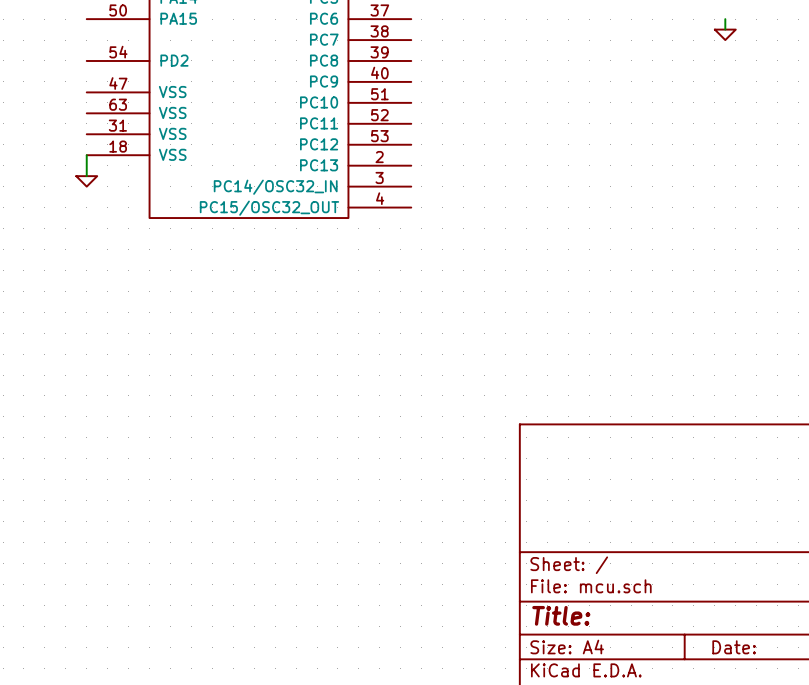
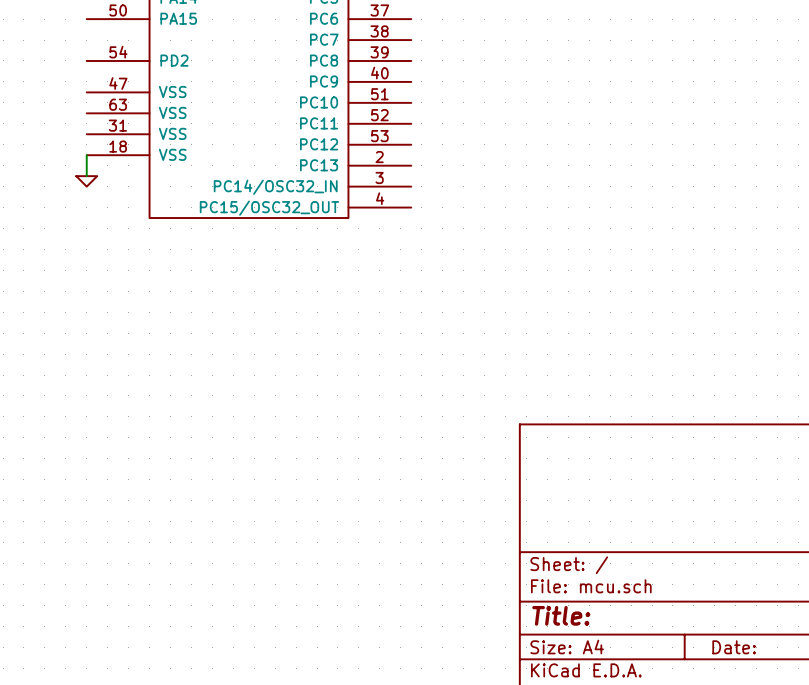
wire: (725, 19) (725, 29) -> none
power symbol: (725, 34) -> none

